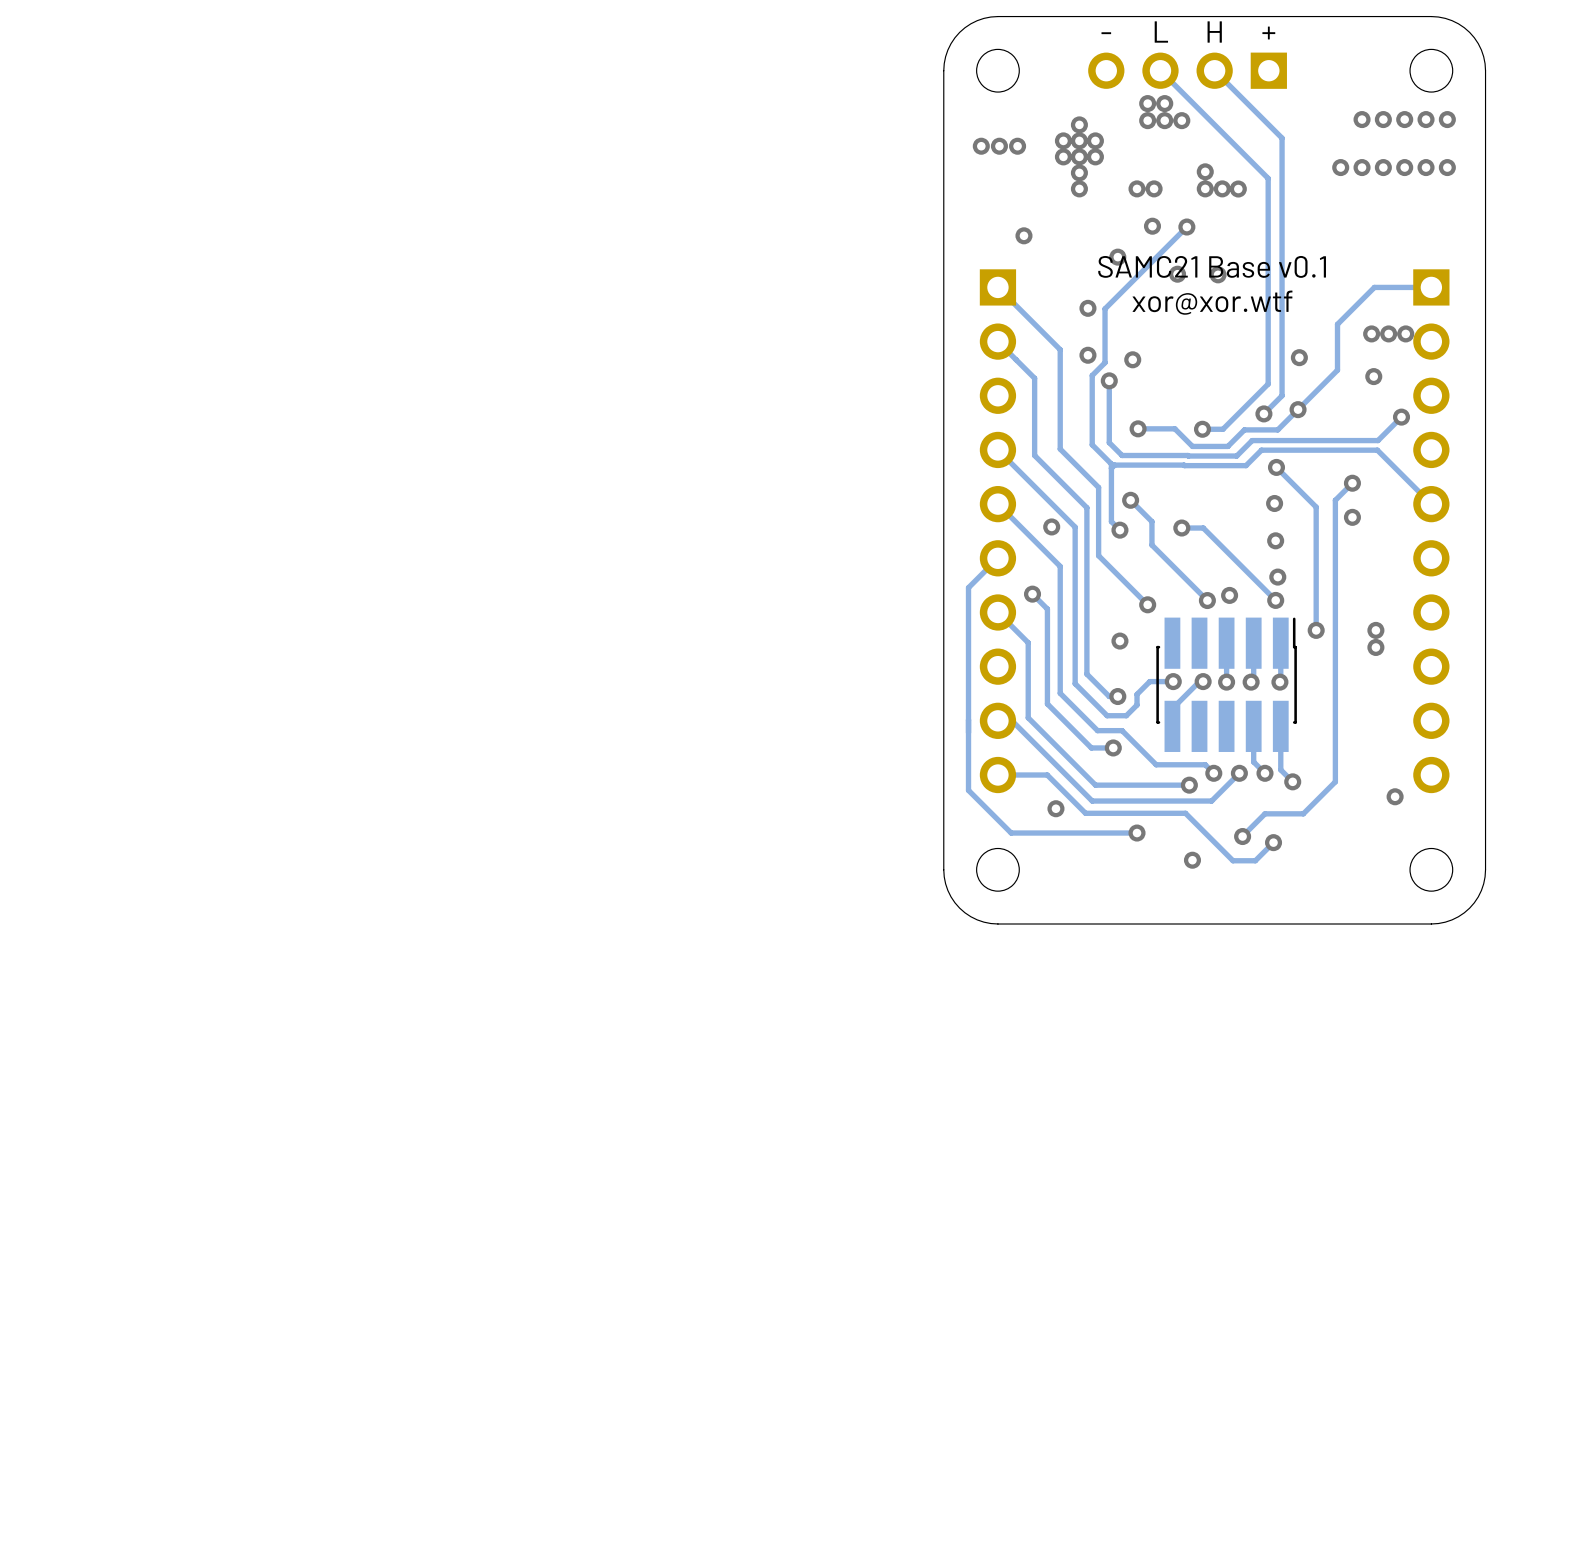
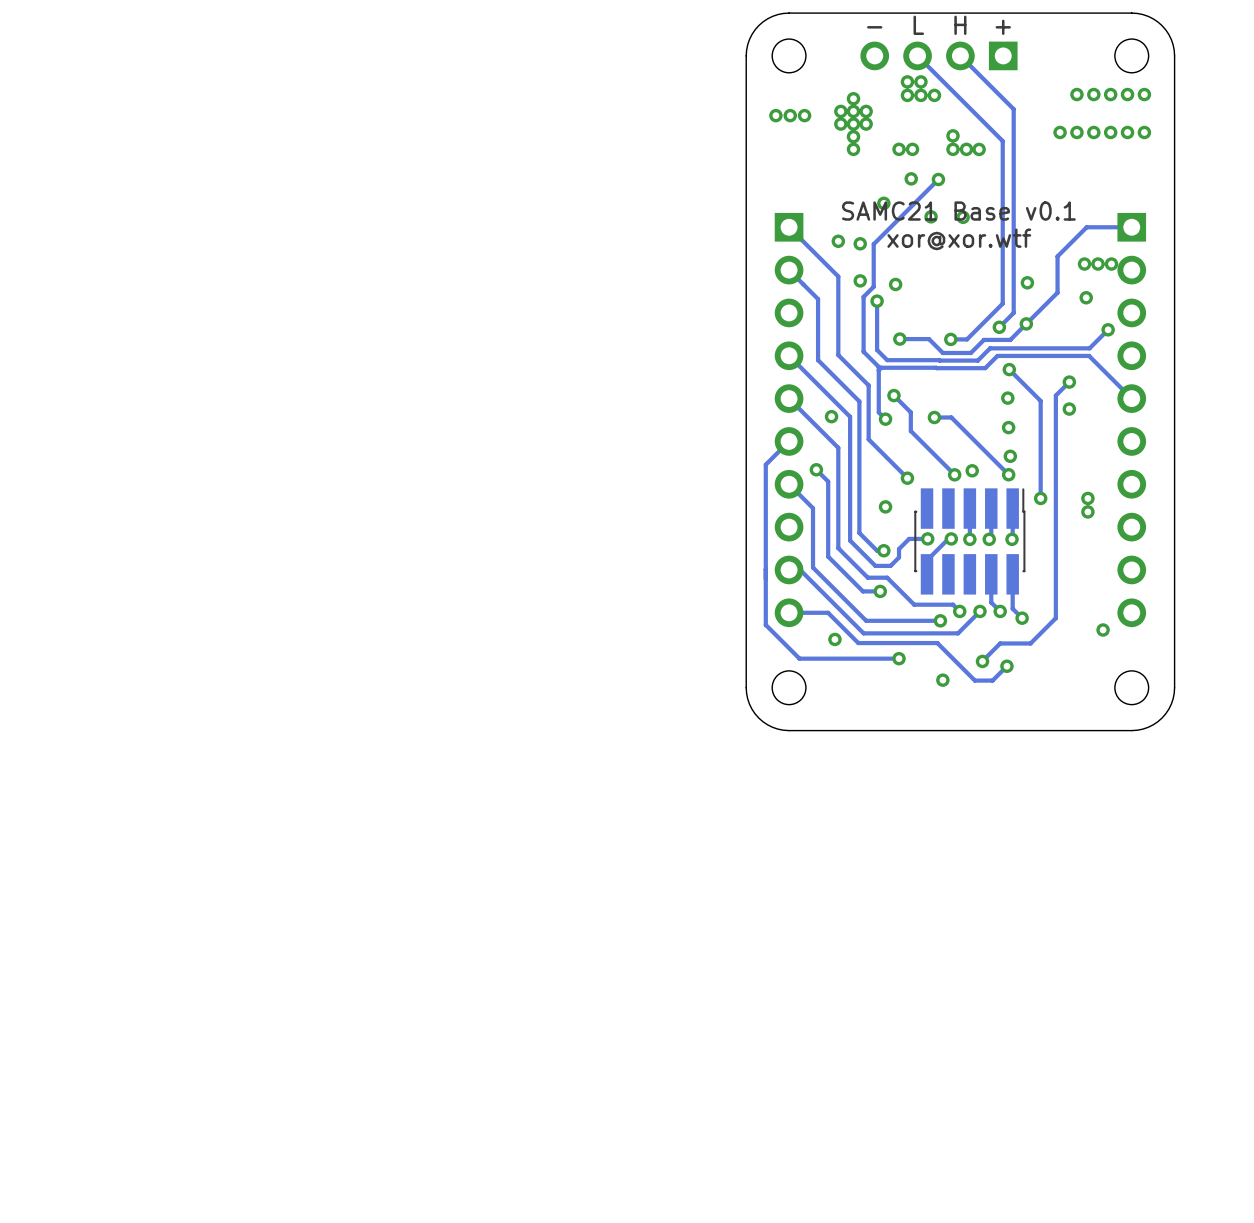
via position: (1023, 235) -> (838, 241)

